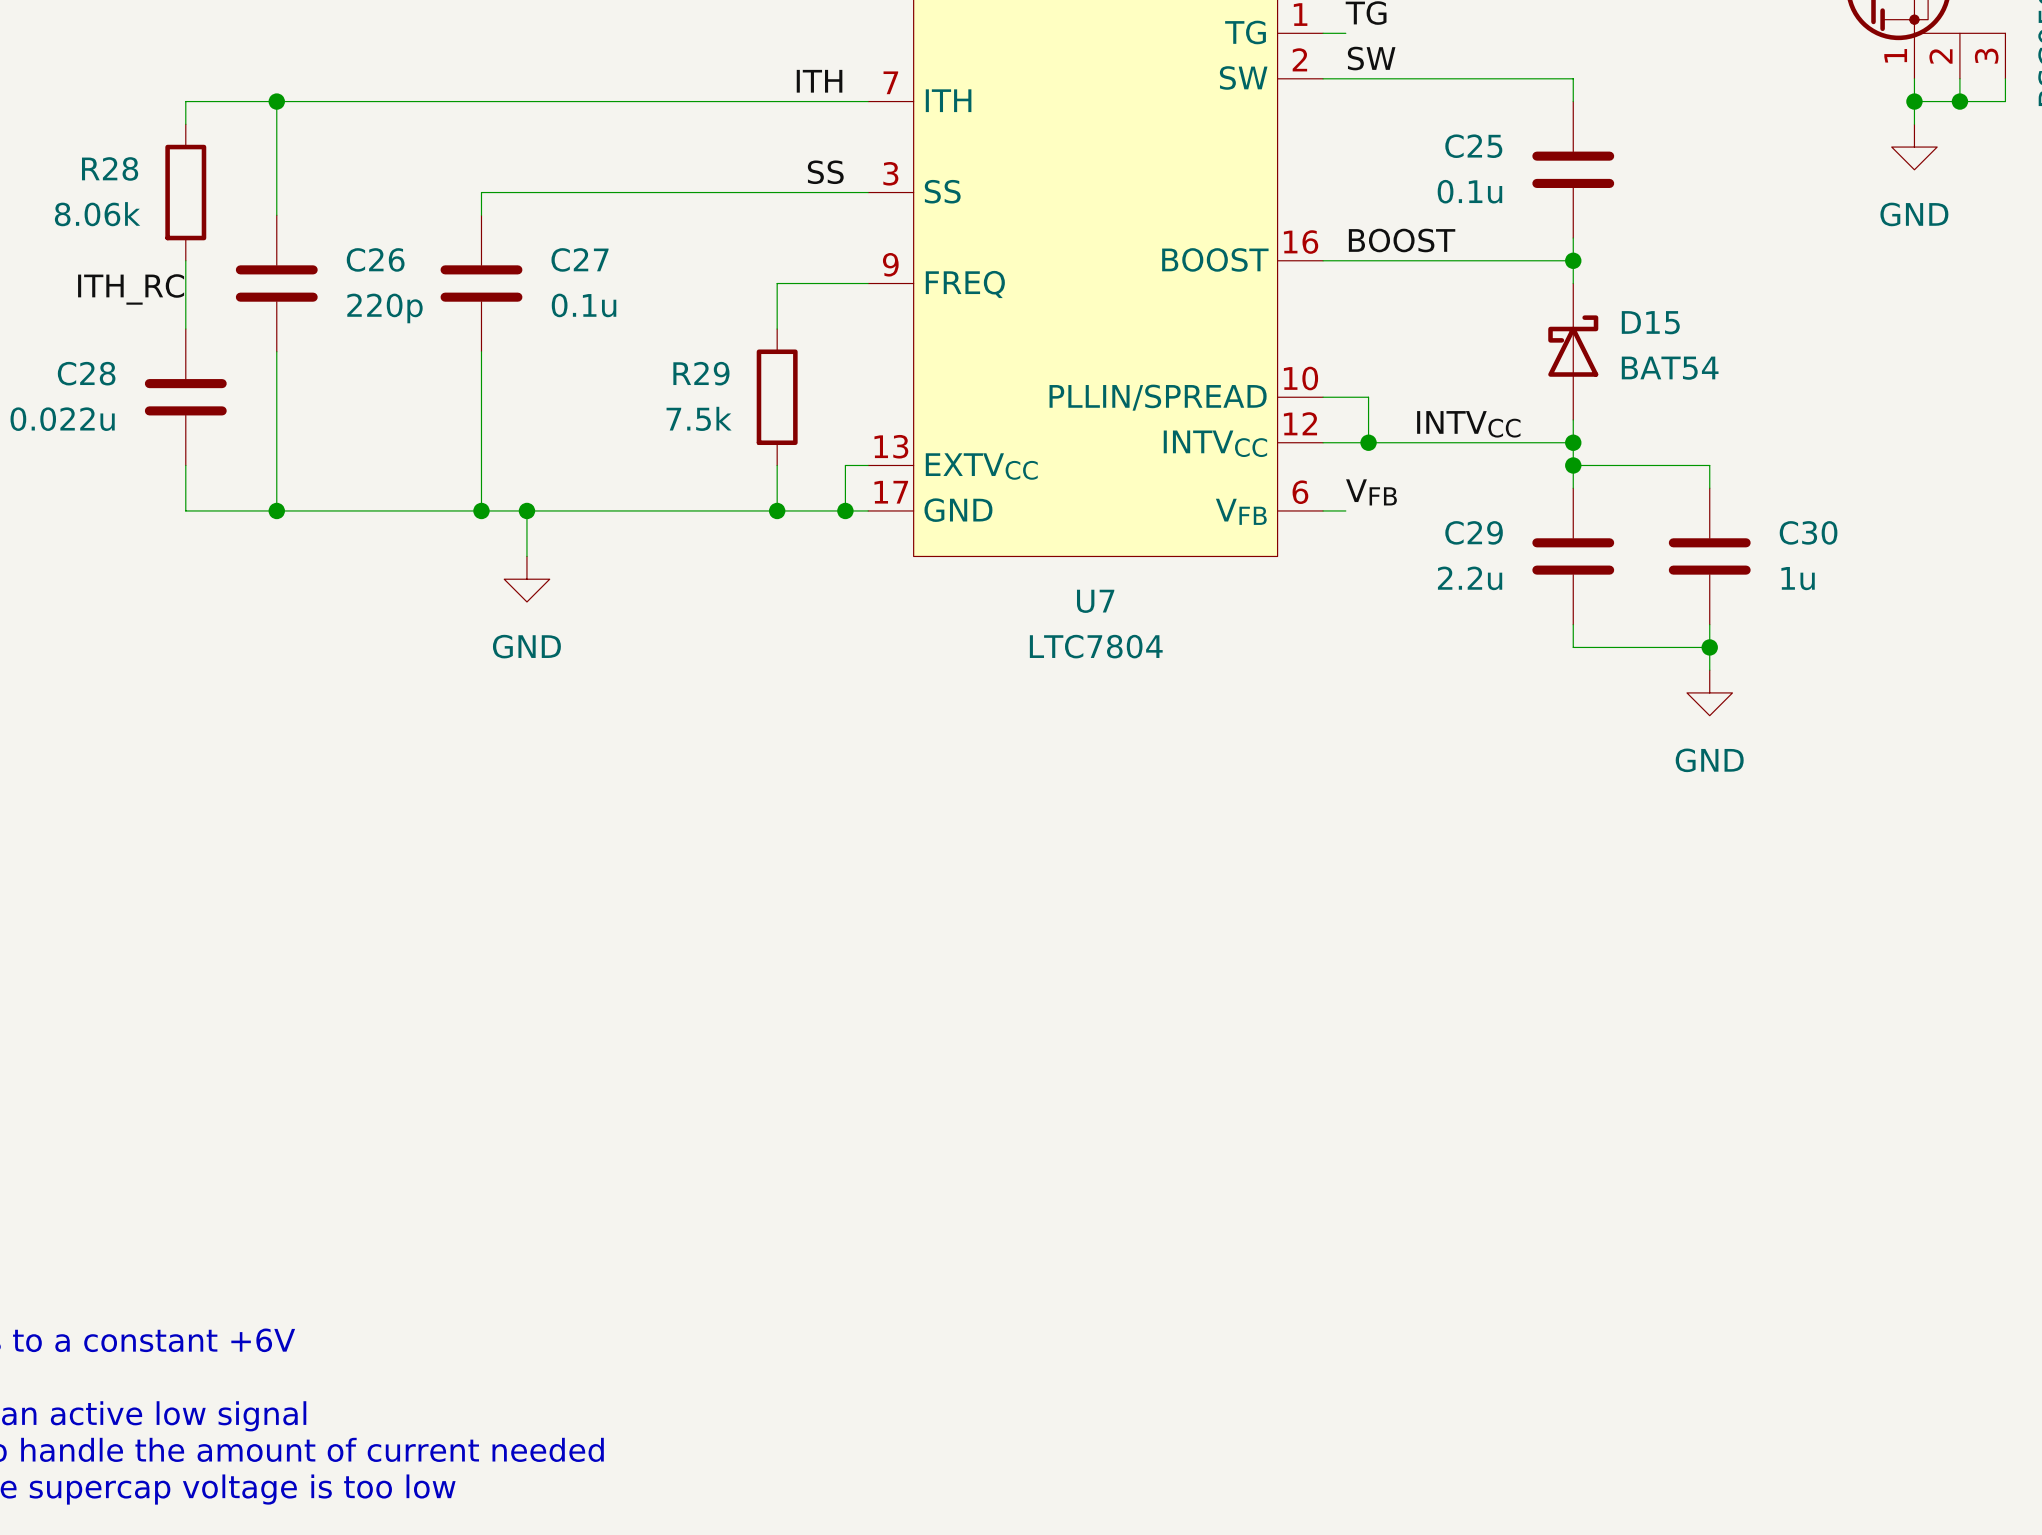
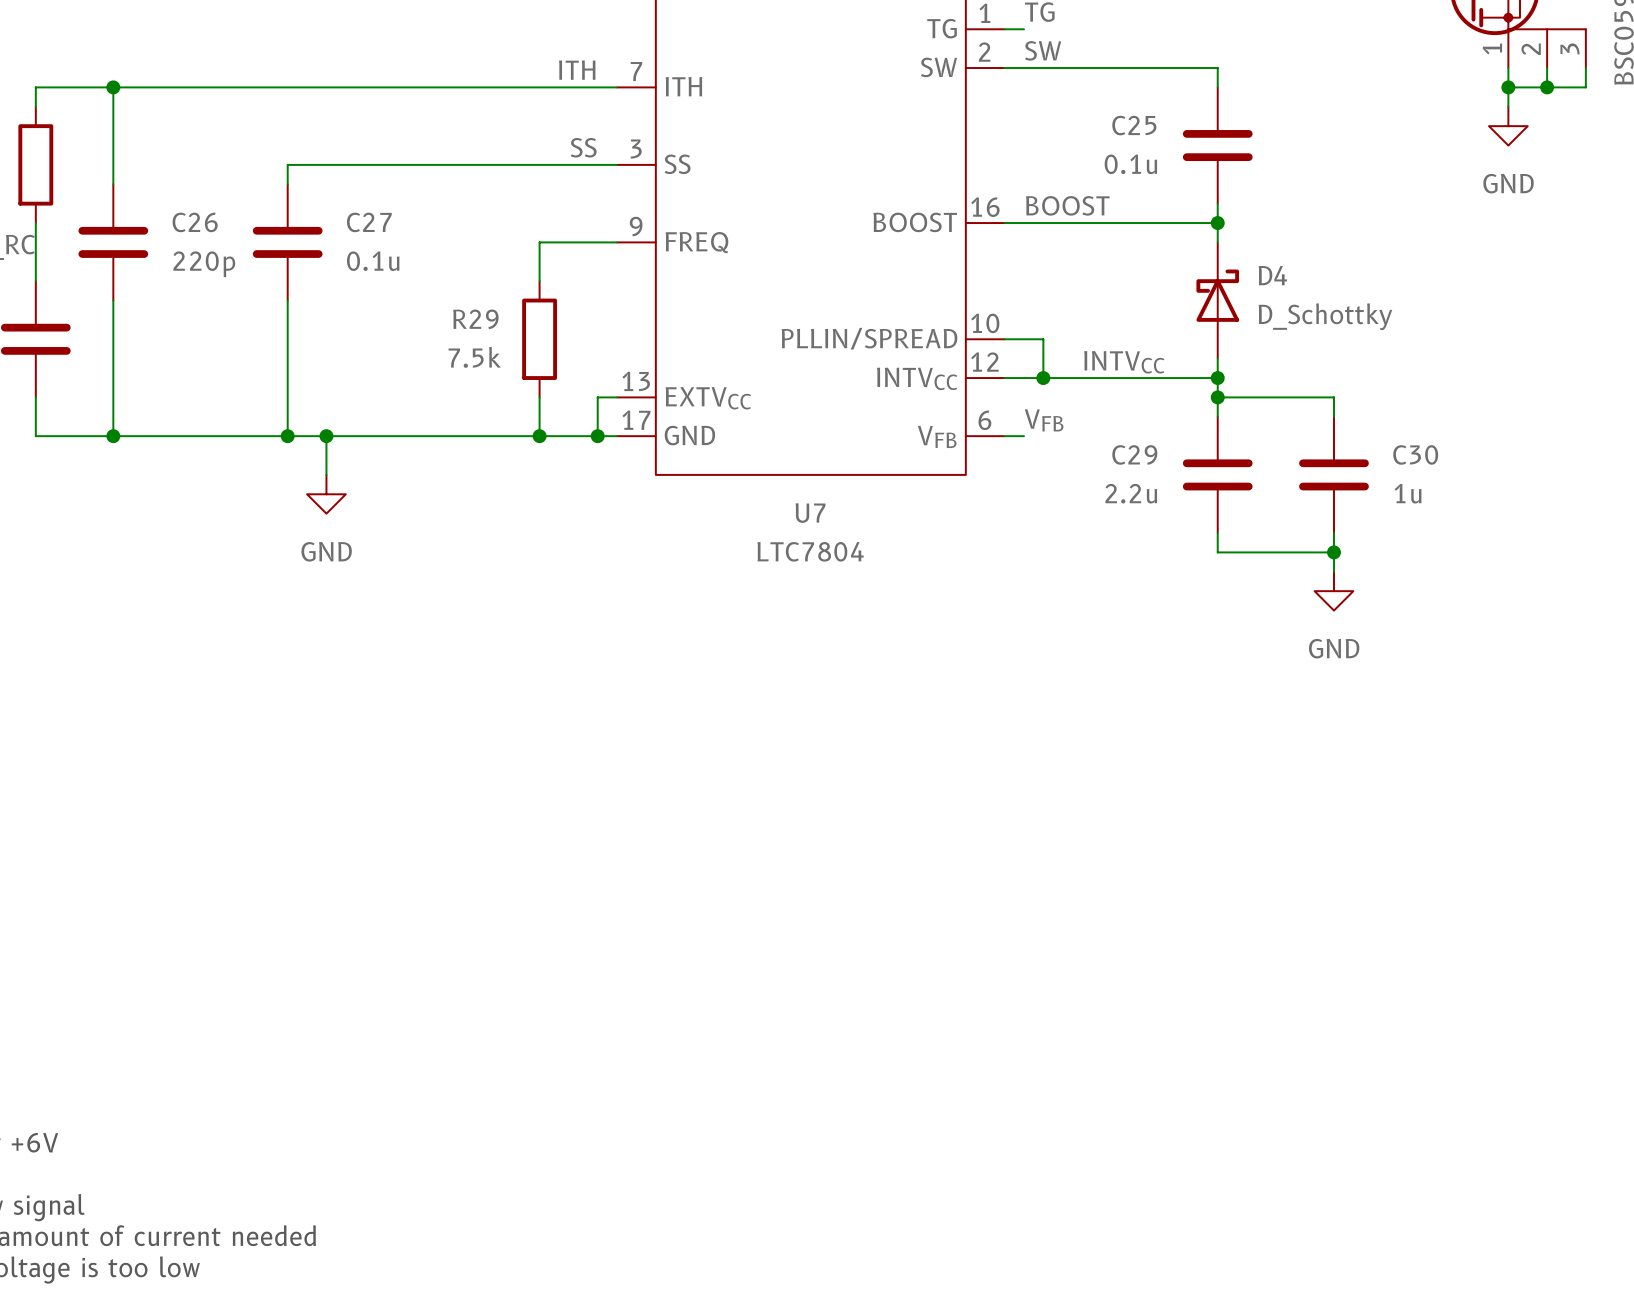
D15 name: D15 (1650, 322) -> D4 (1272, 275)
D15 value: BAT54 (1670, 368) -> D_Schottky (1325, 316)

